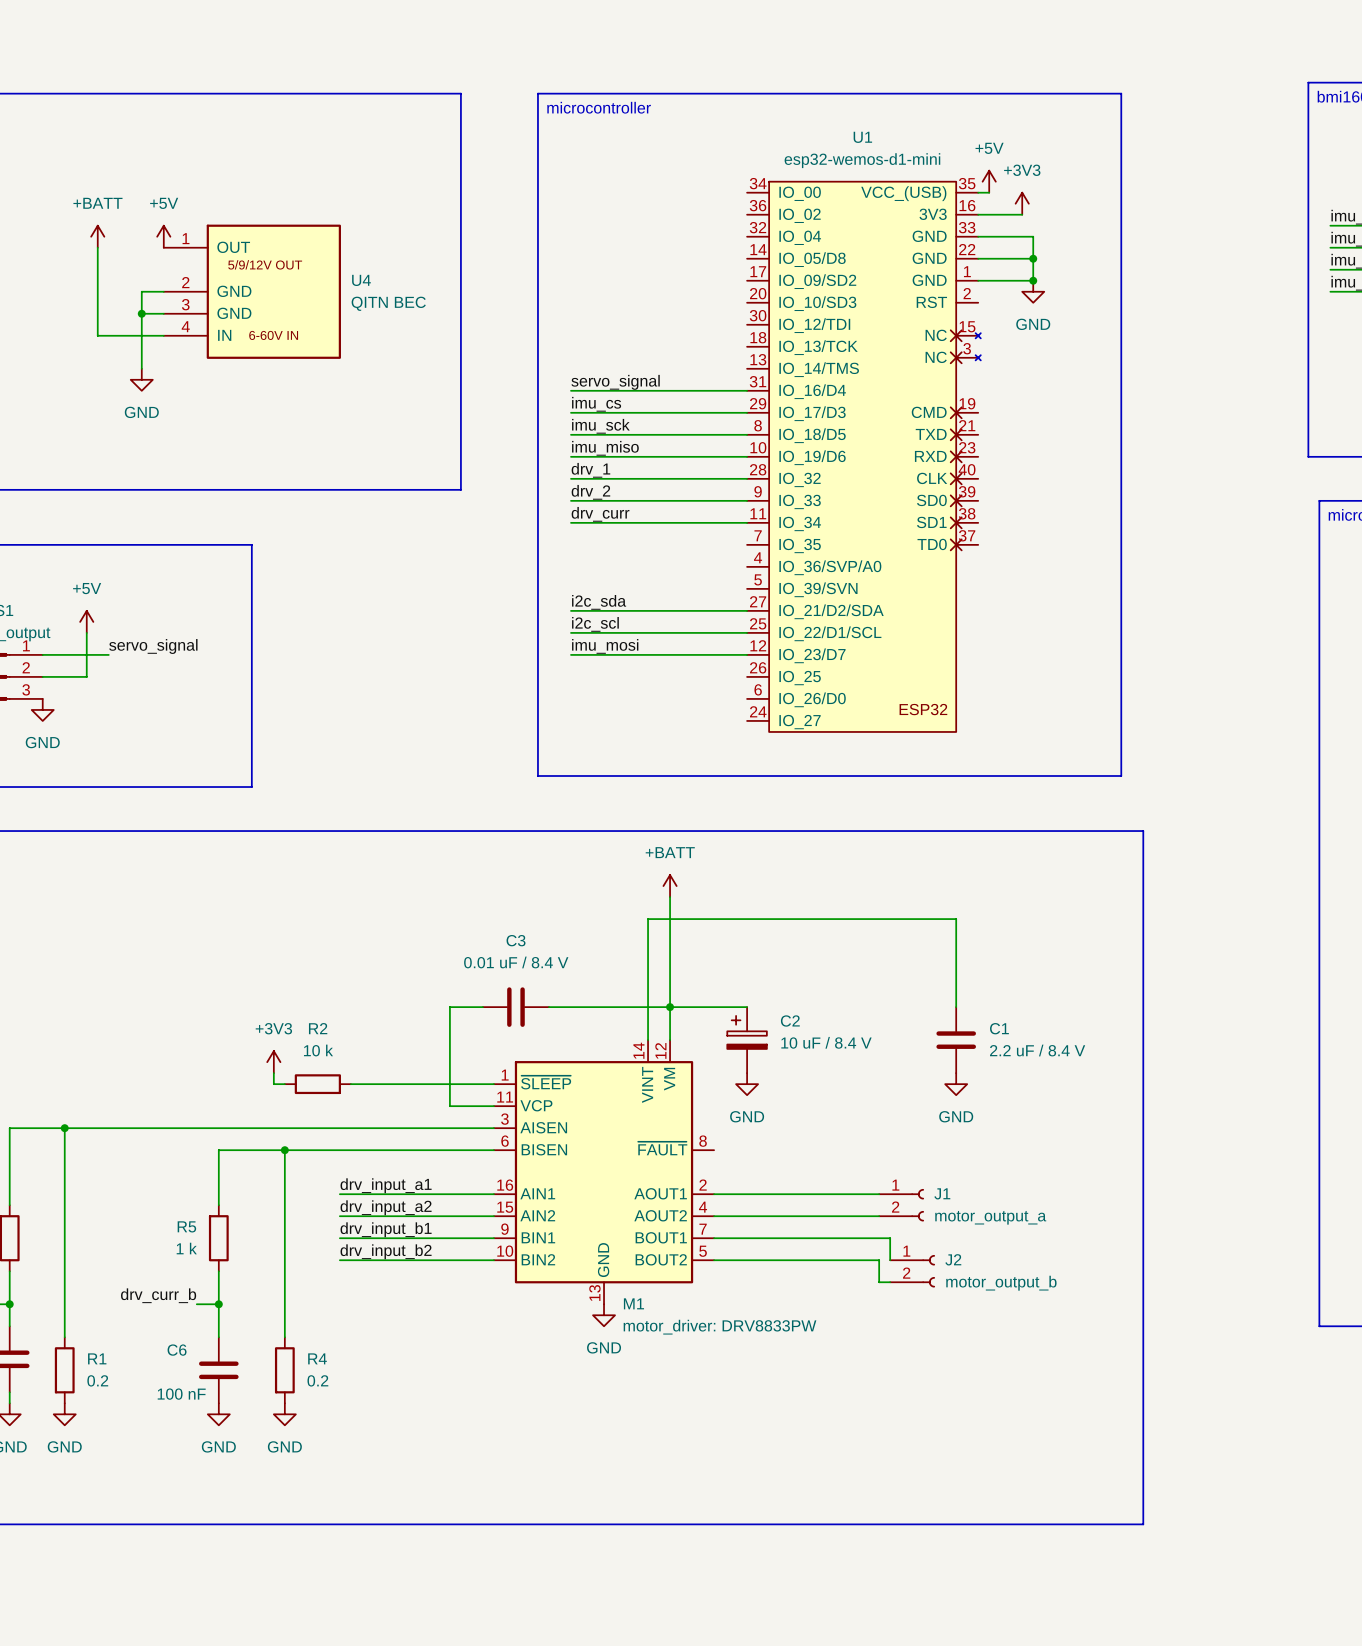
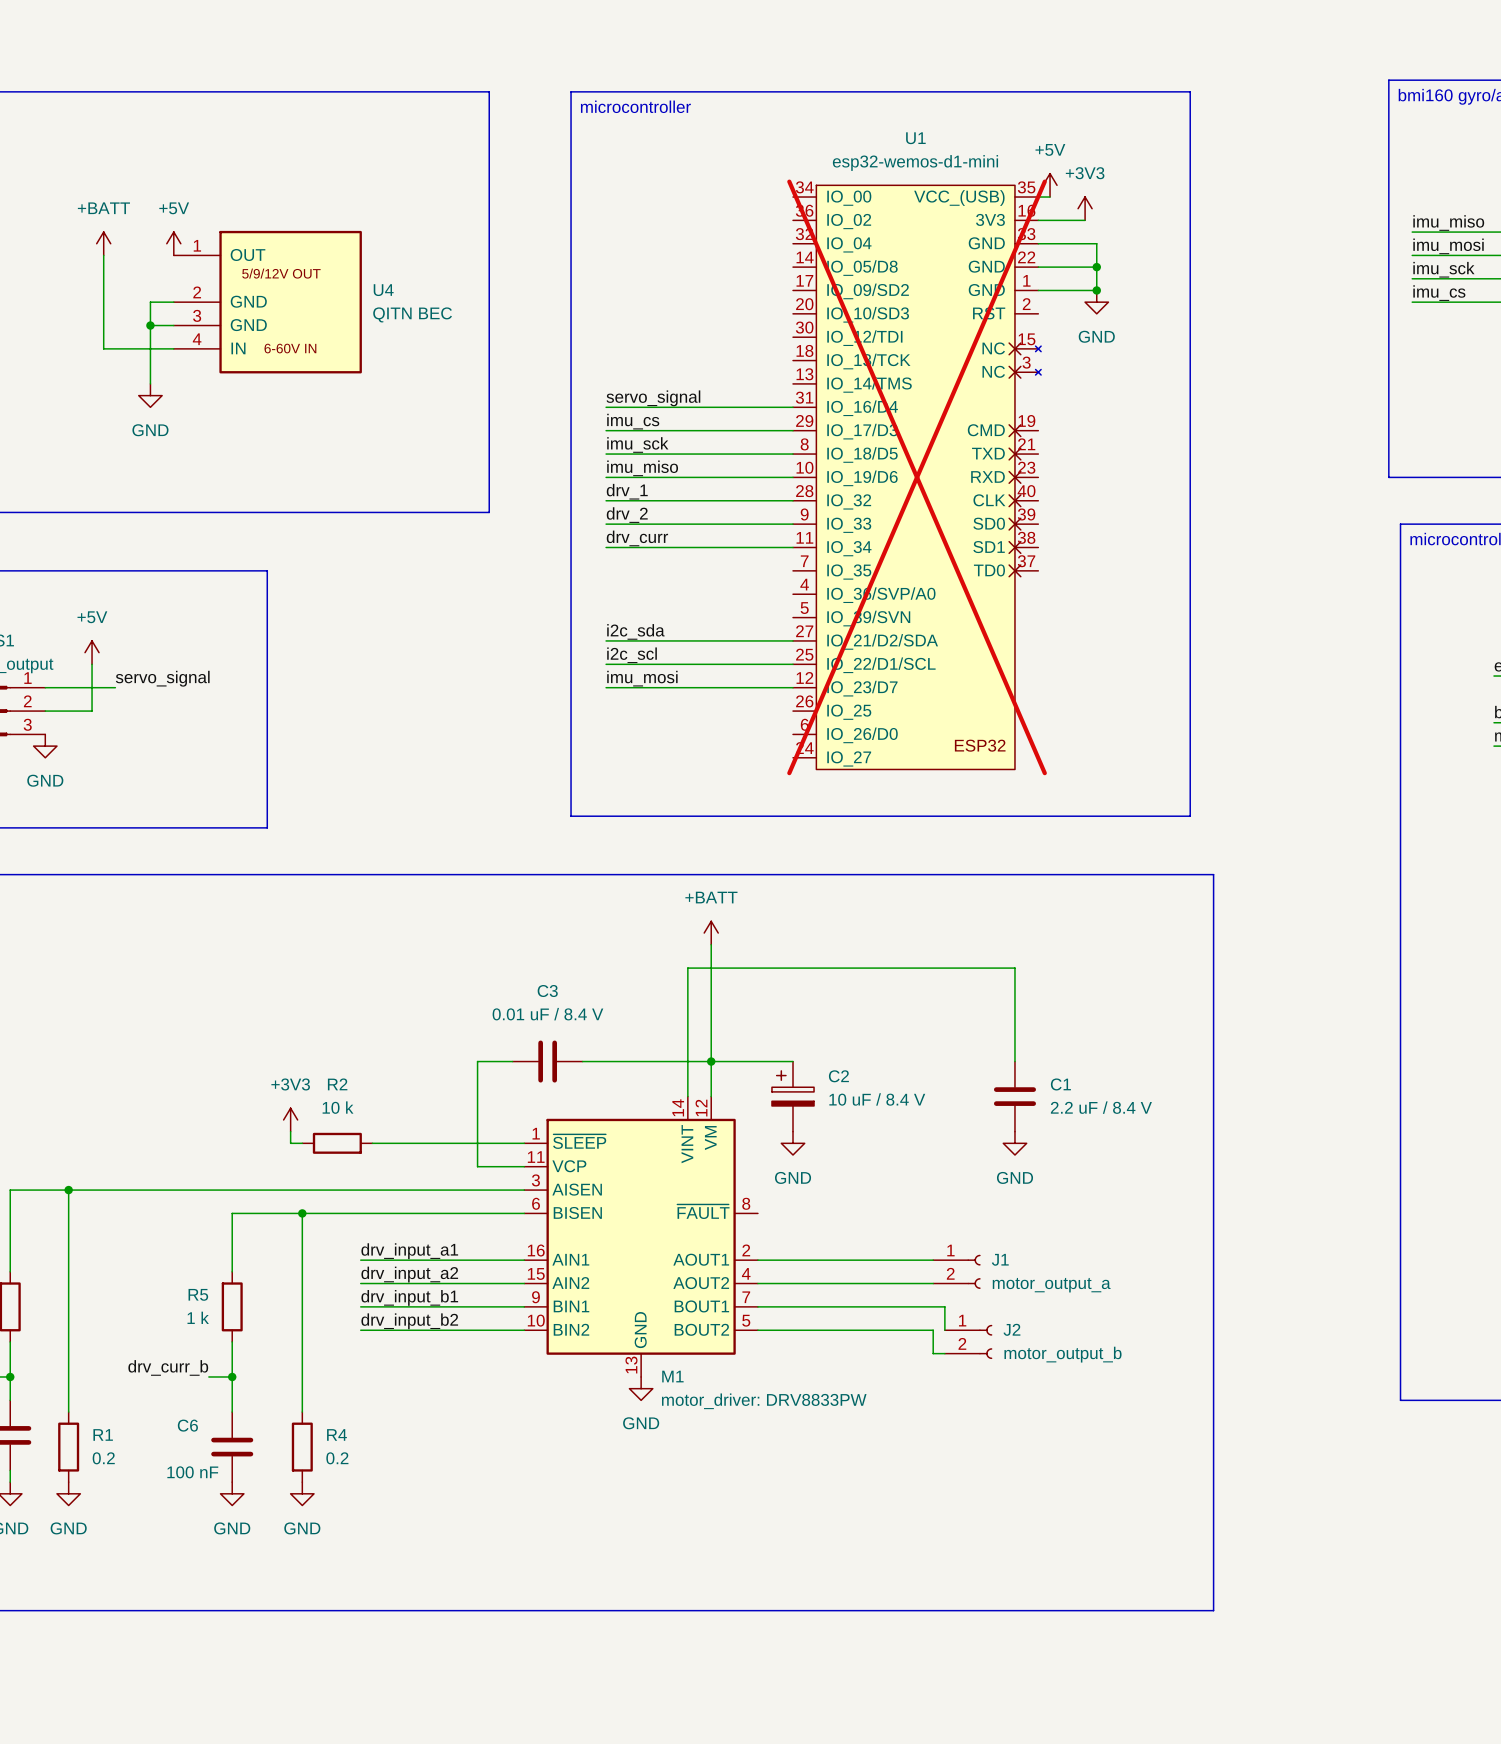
U1 do-not-place cross: none -> (917, 477)

